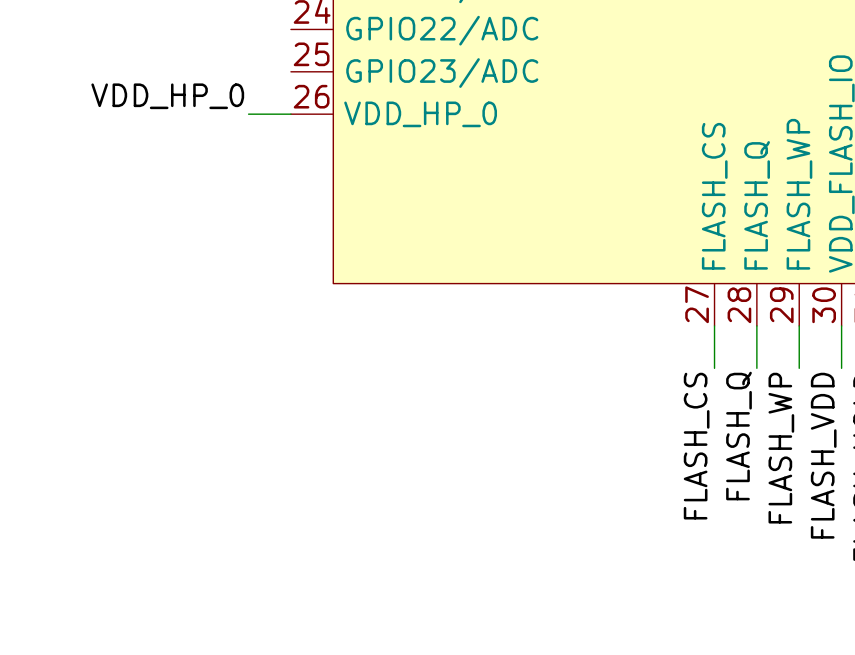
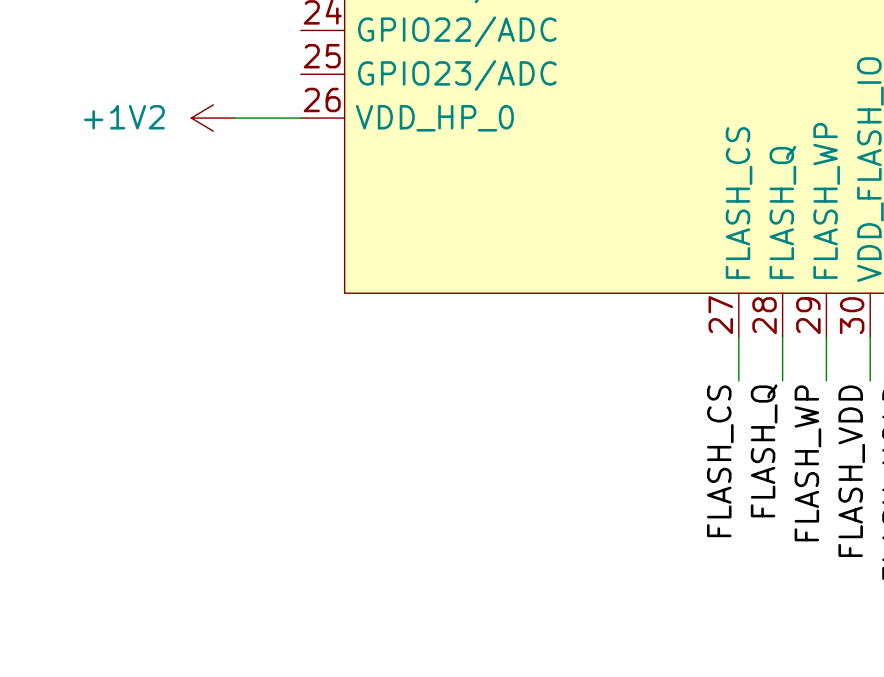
label: VDD_HP_0 (167, 96) -> none
power symbol: none -> +1V2 (213, 118)
wire: none -> (235, 118) (257, 118)

